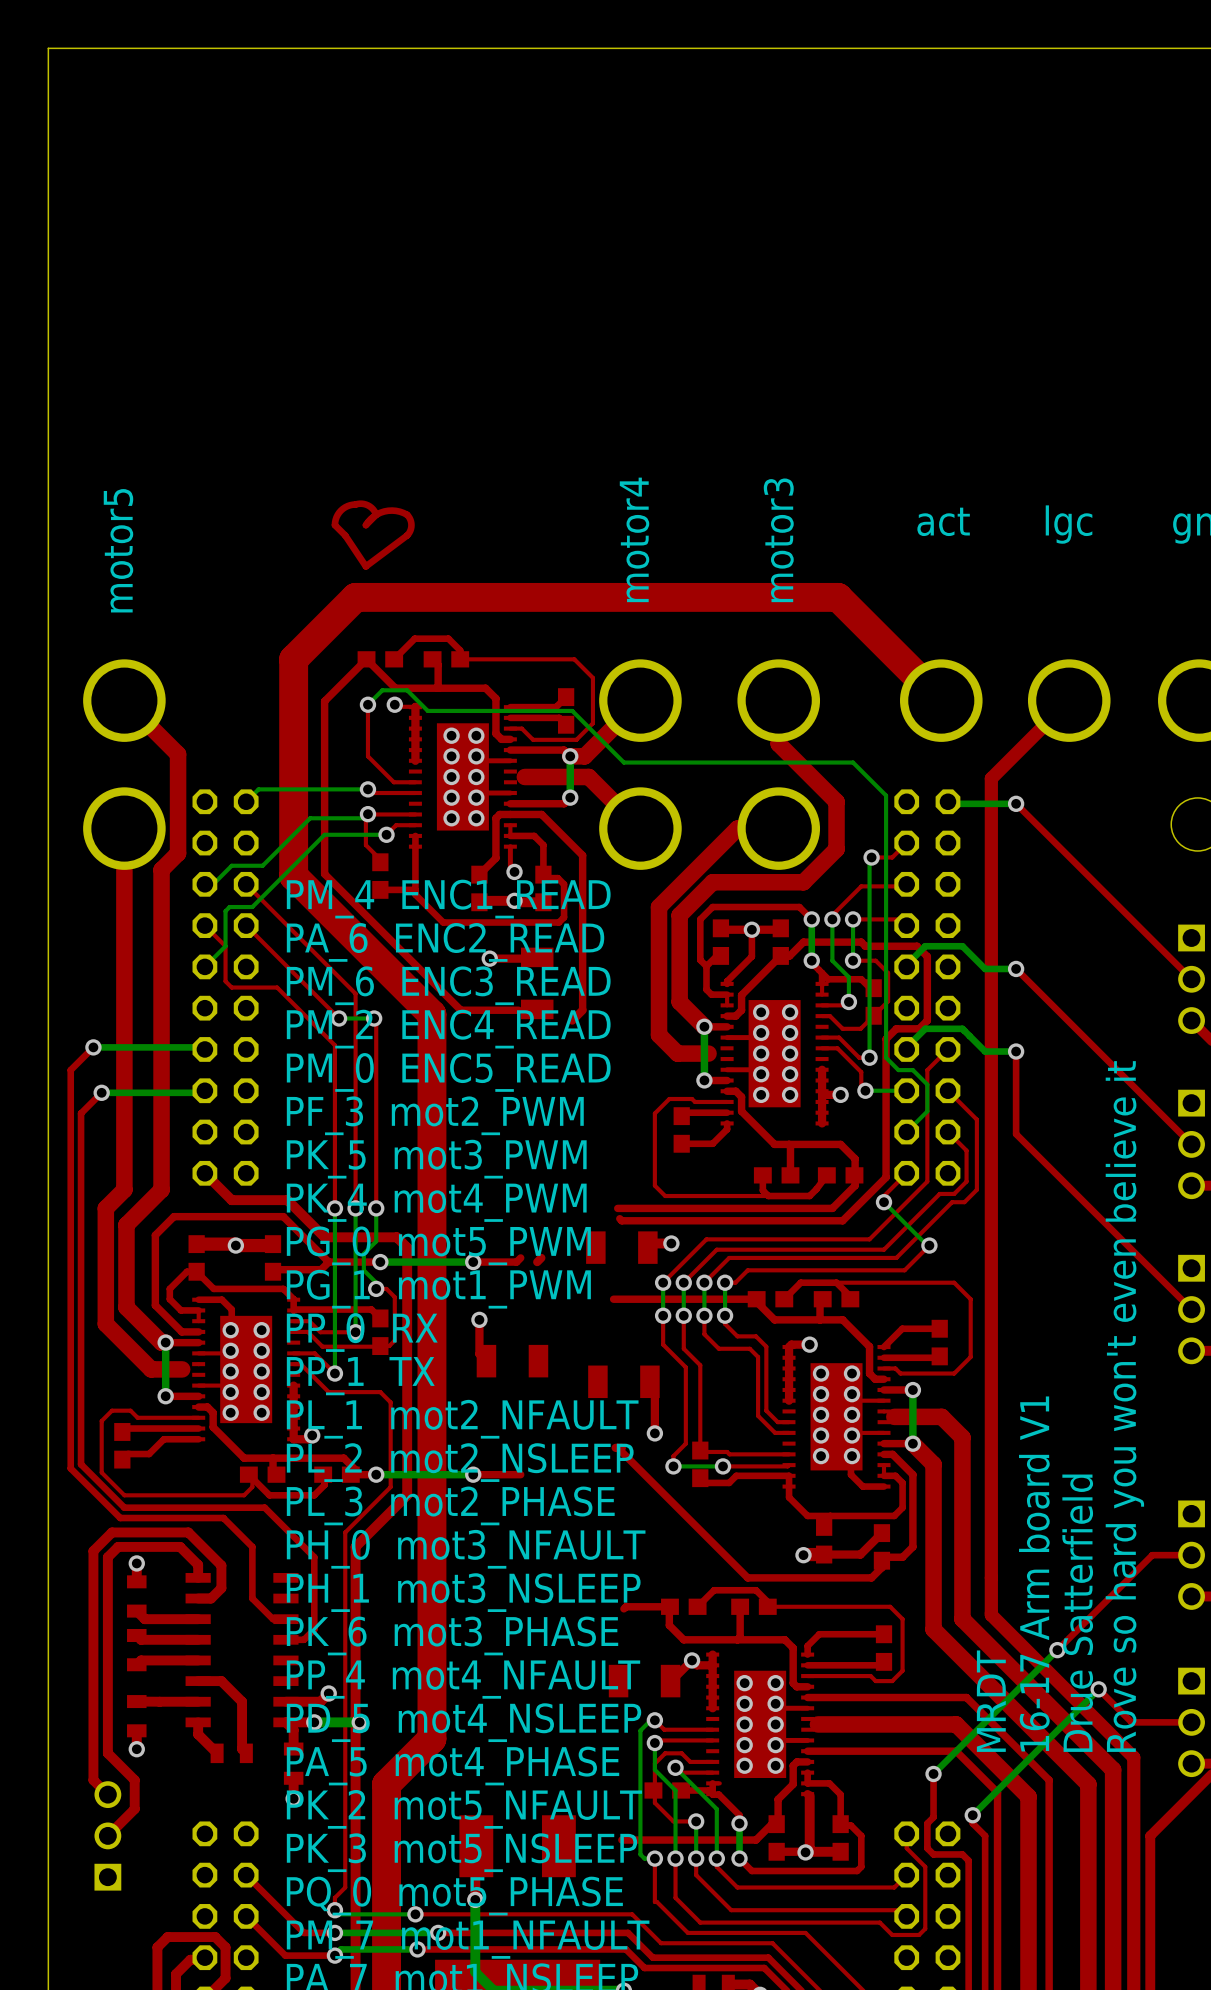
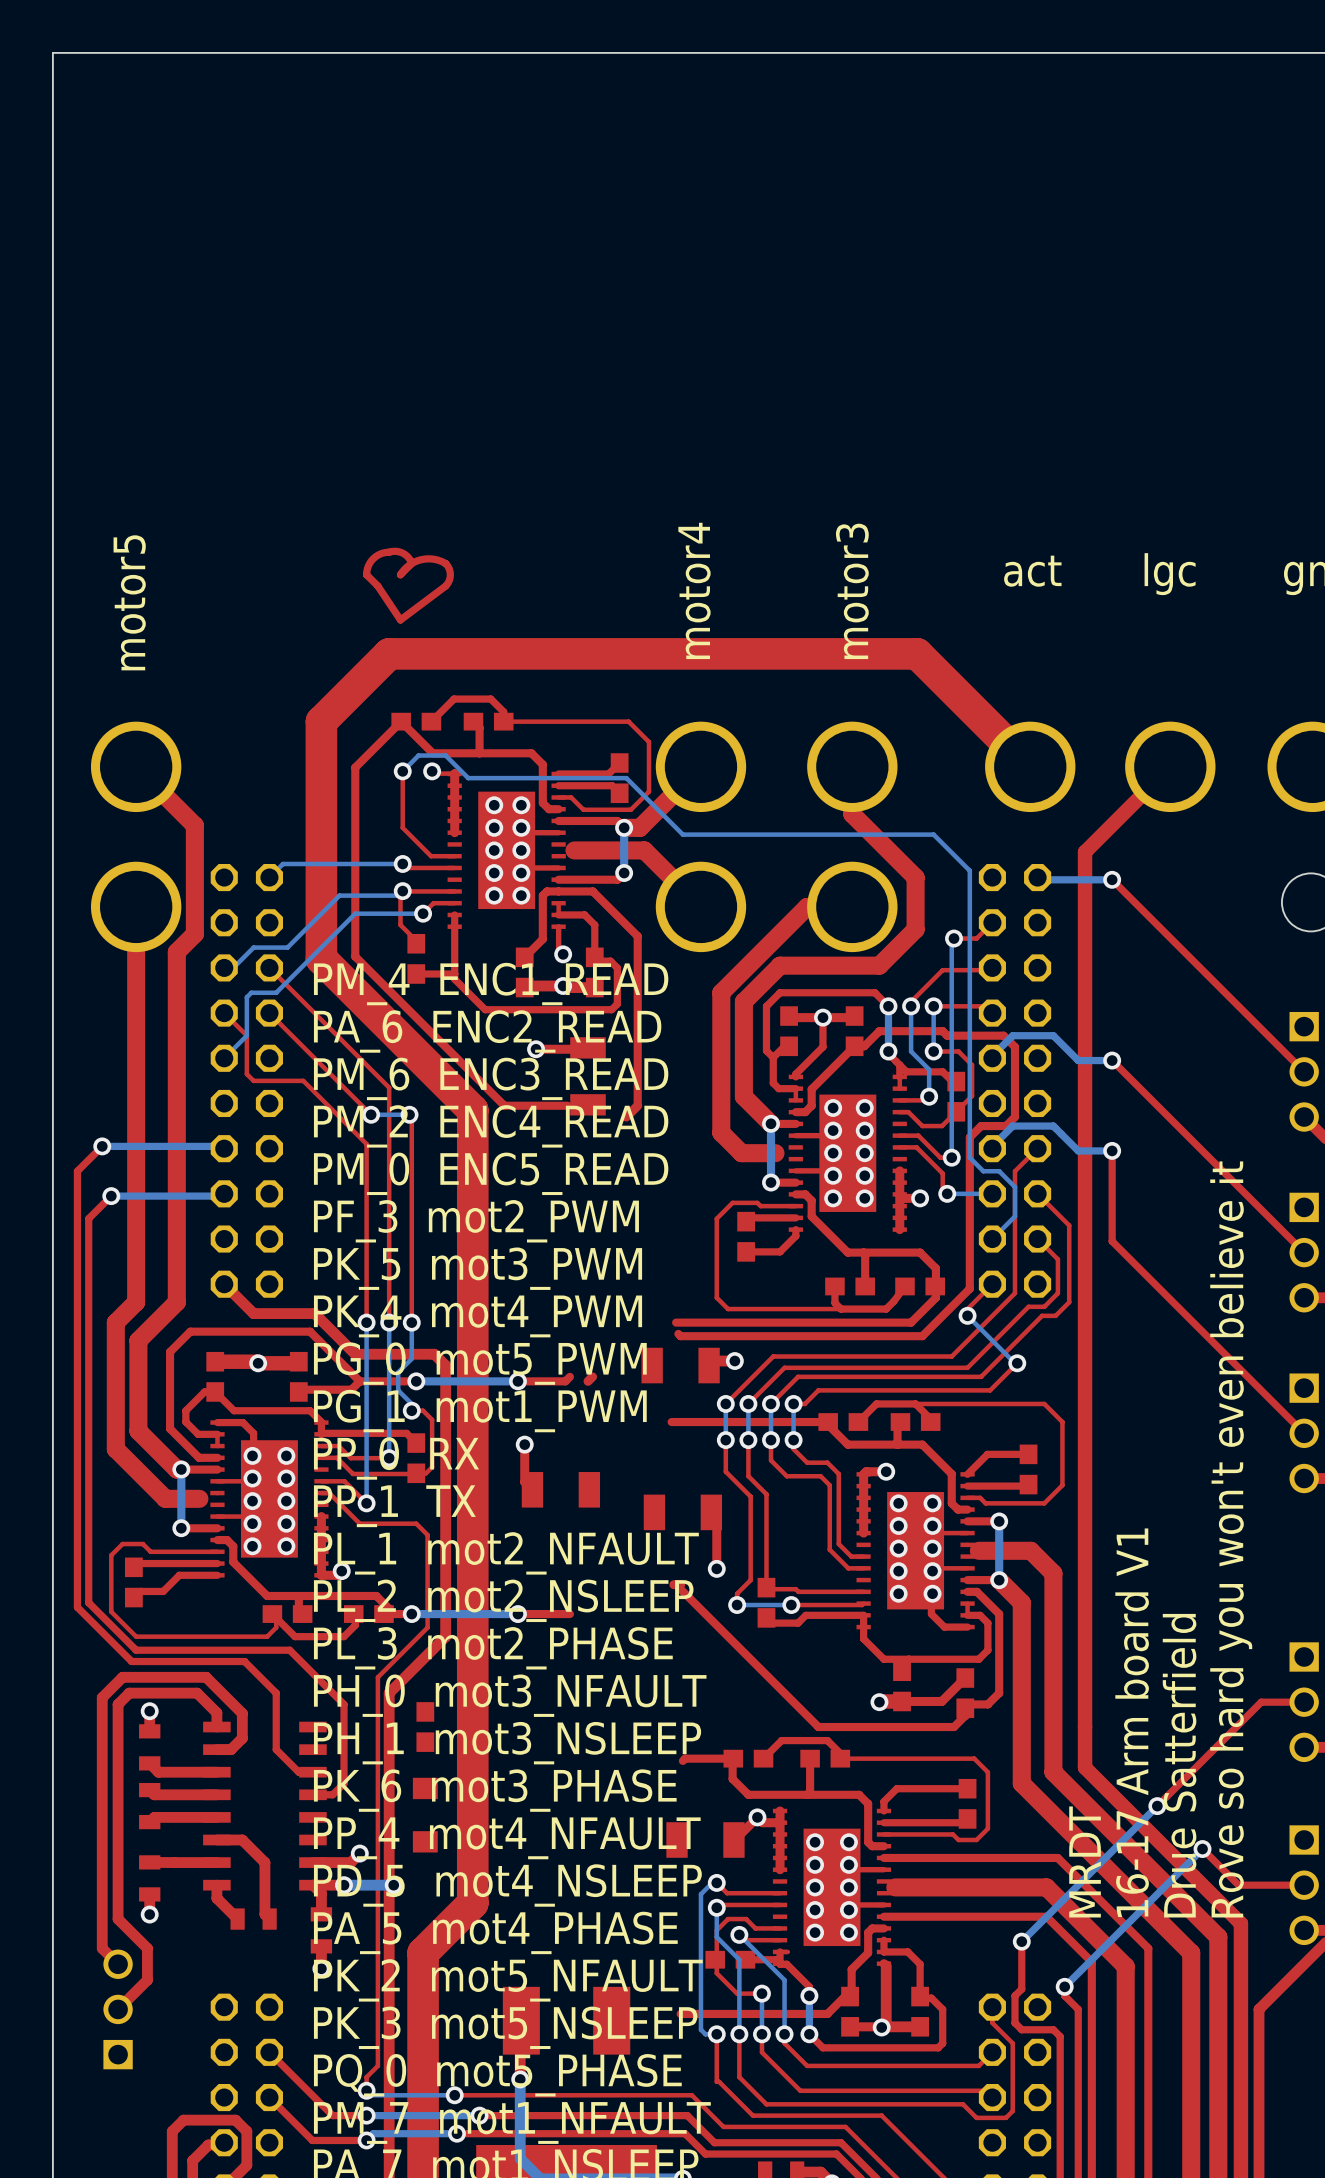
part: none -> (425, 1727)
part: none -> (425, 1815)

